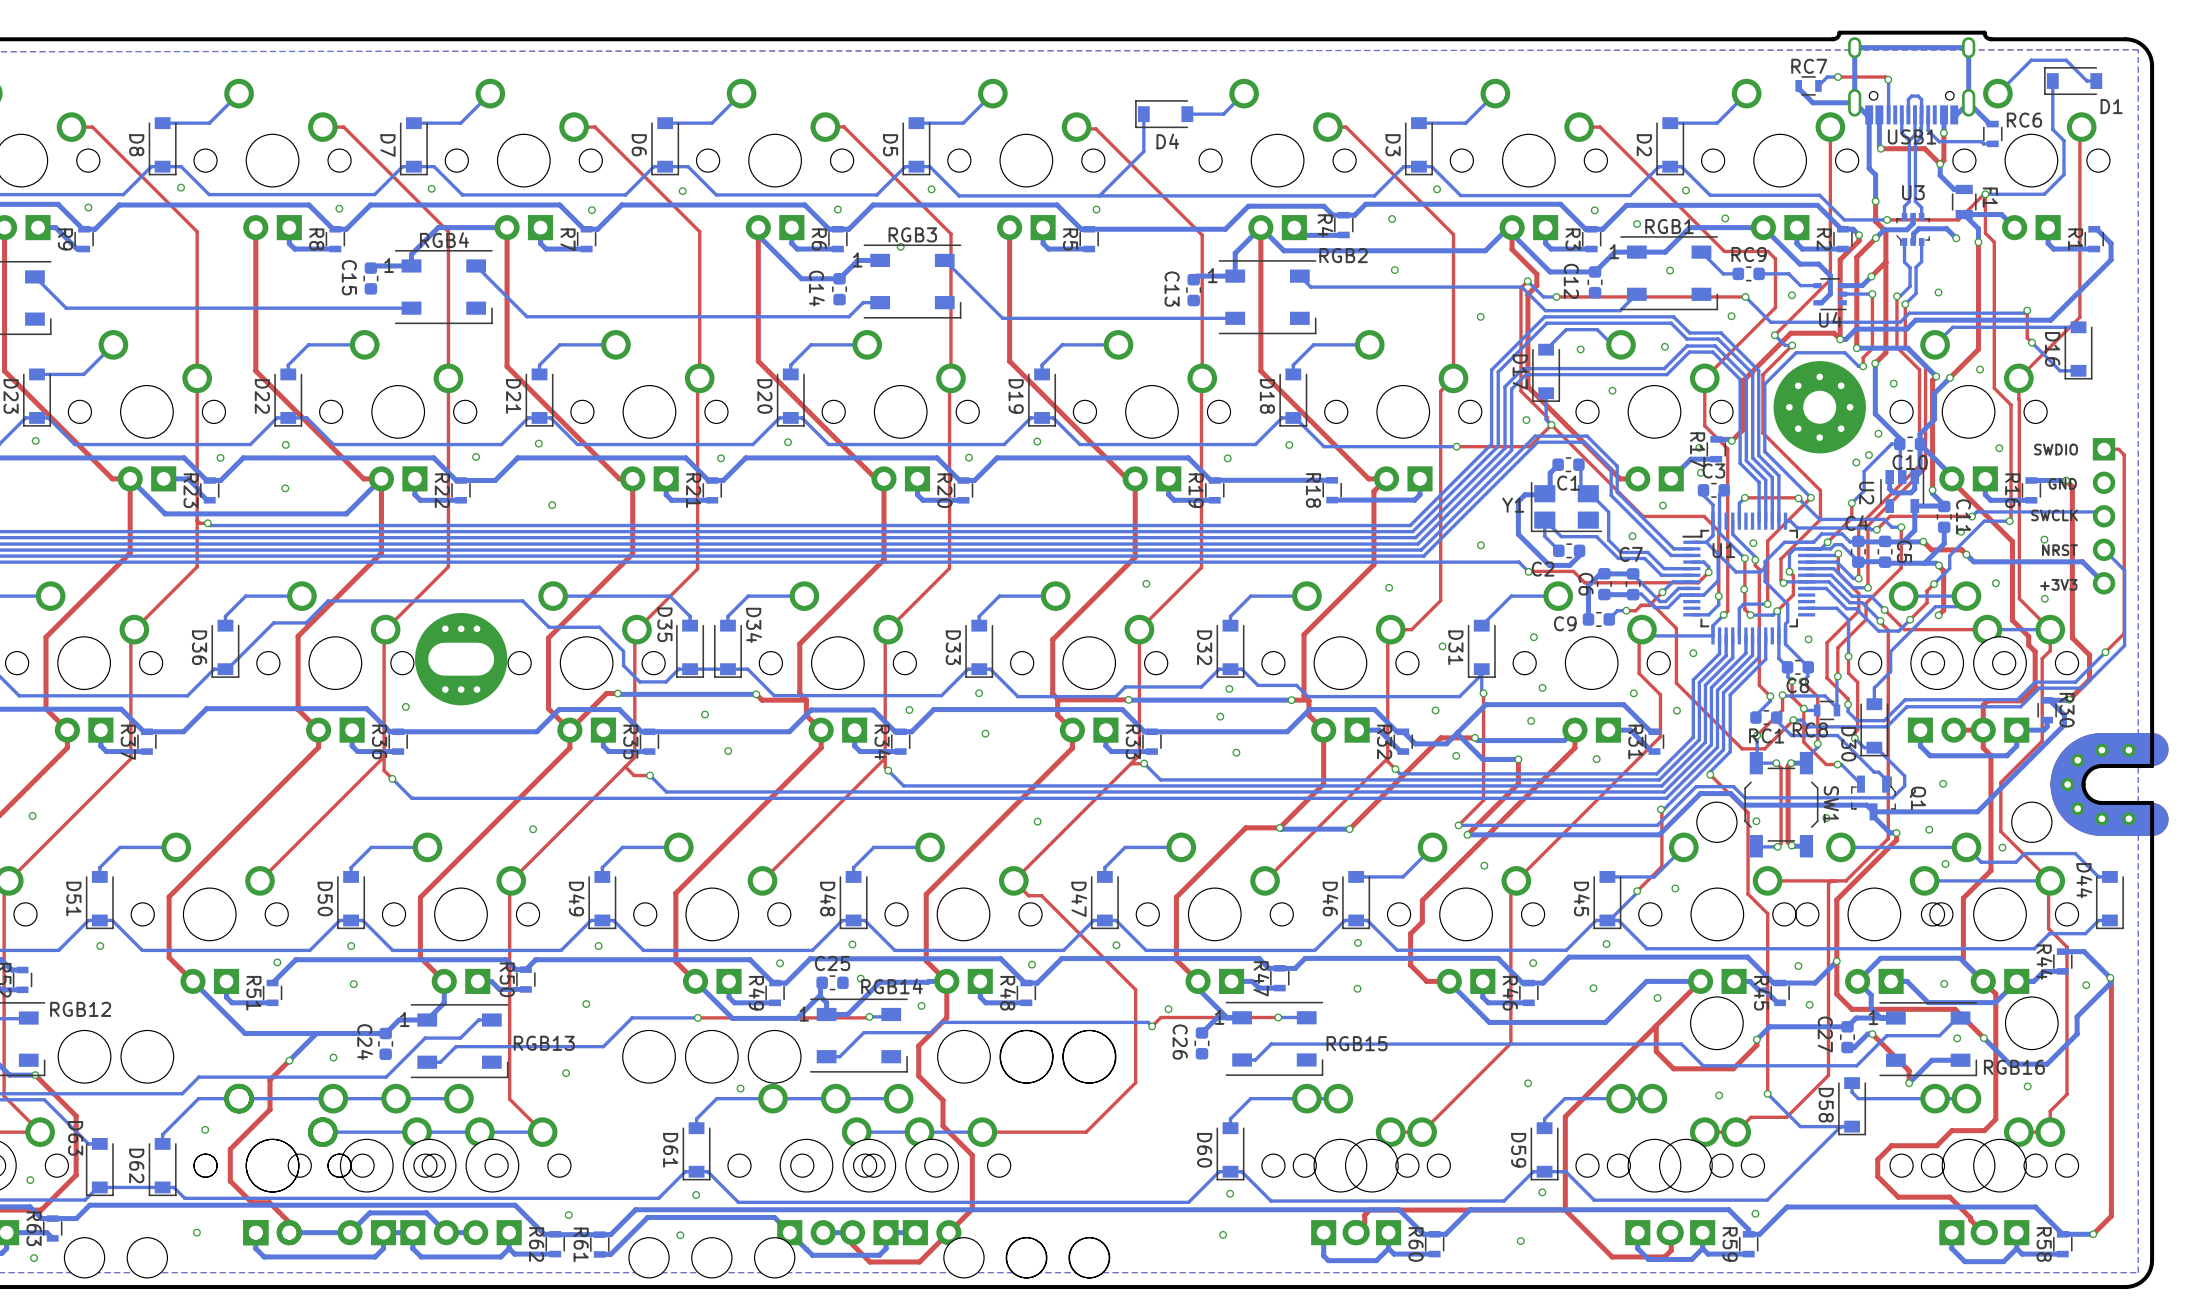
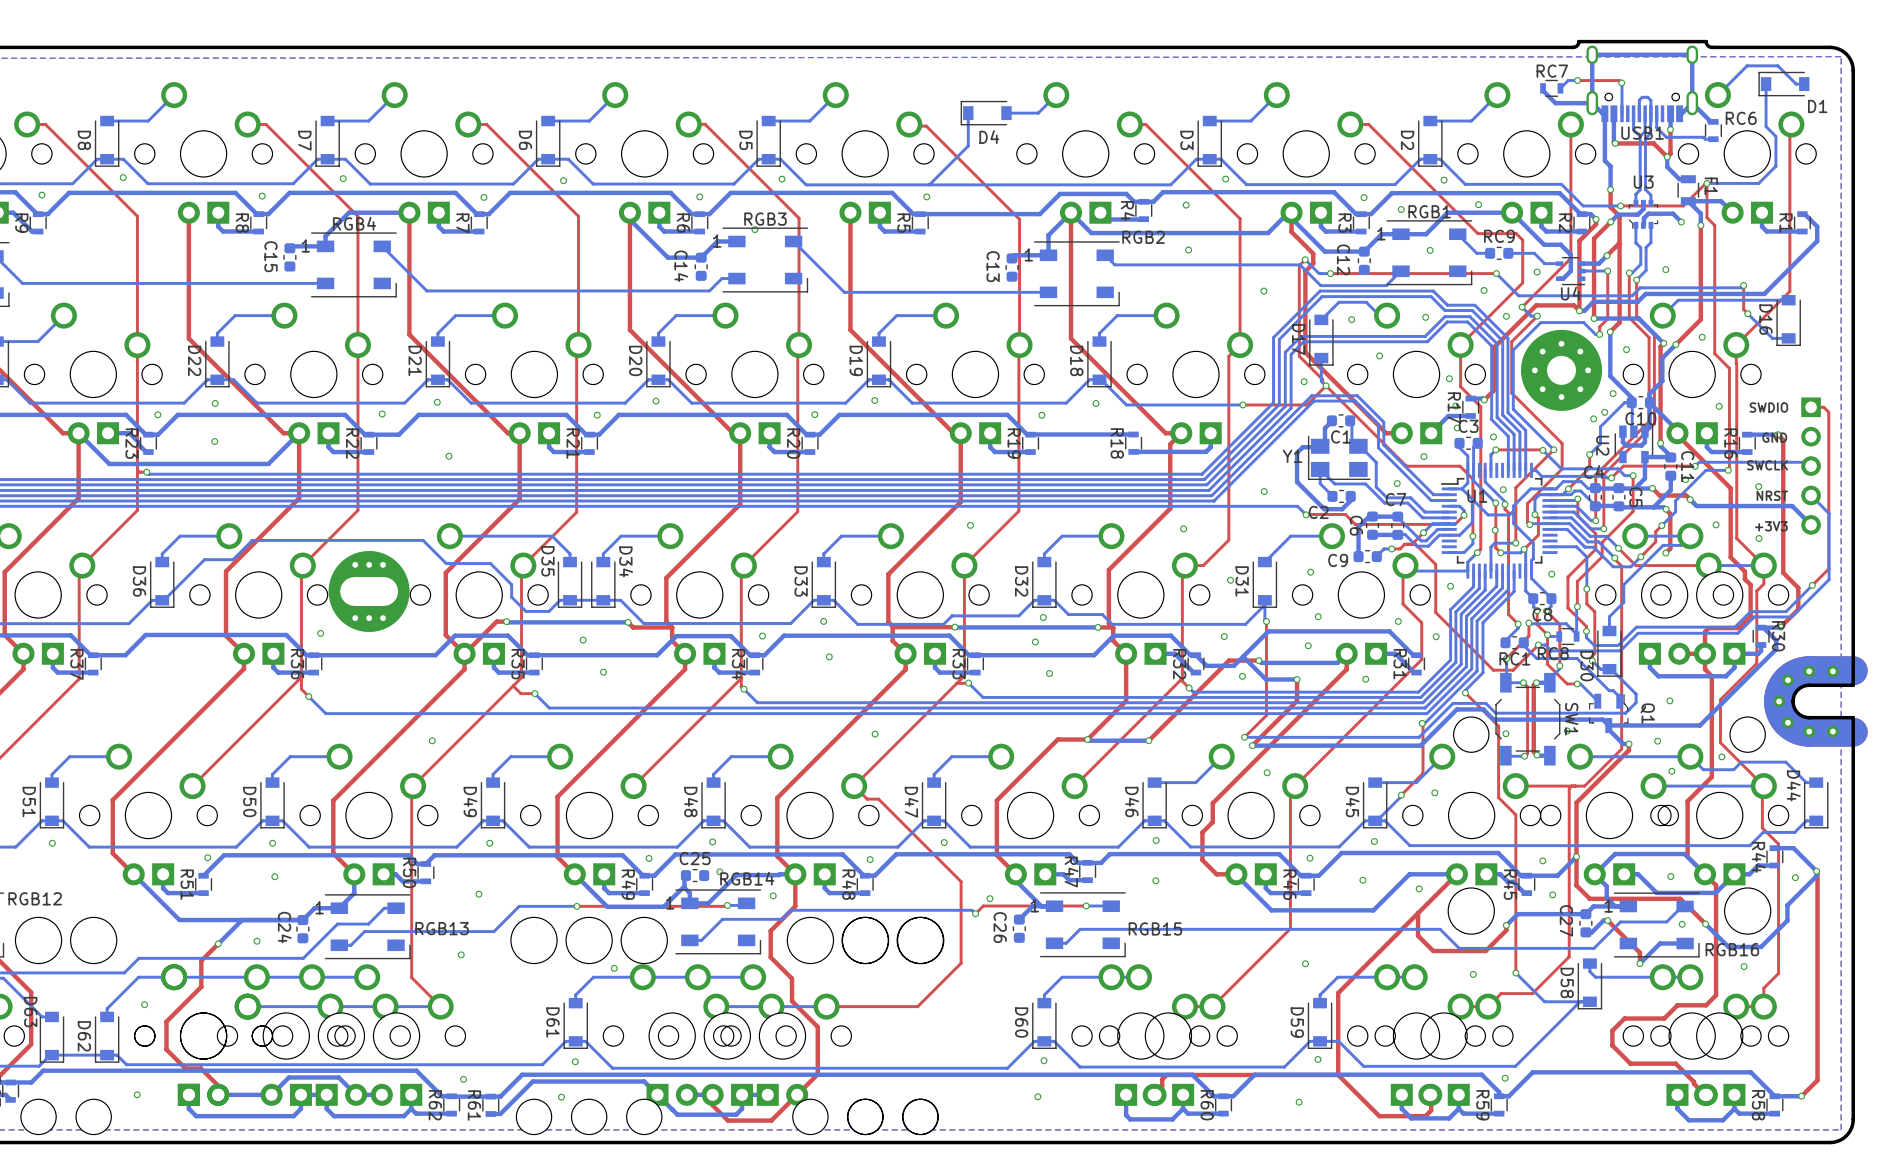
via: none -> (1506, 316)
via: none -> (1449, 378)
via: none -> (1493, 436)

